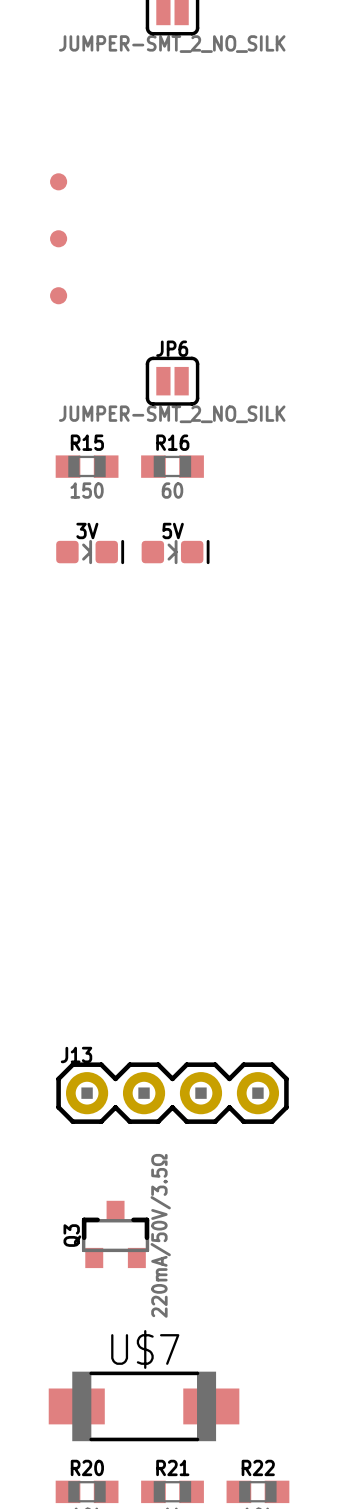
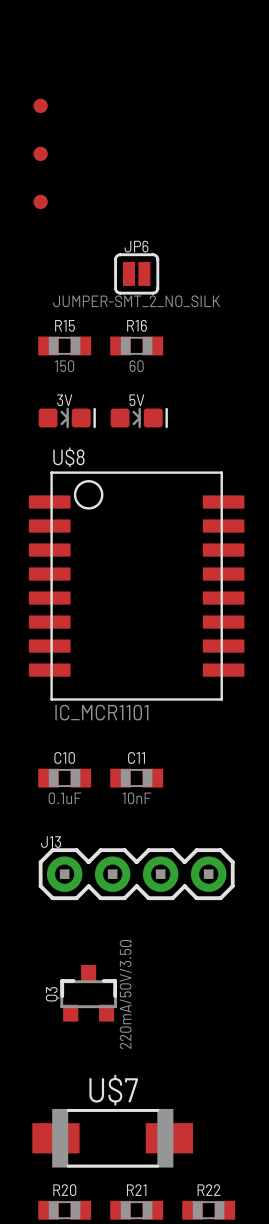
U$8: none -> IC_MCR1101 (136, 586)
C10: none -> 0.1uF (64, 778)
C11: none -> 10nF (136, 778)

